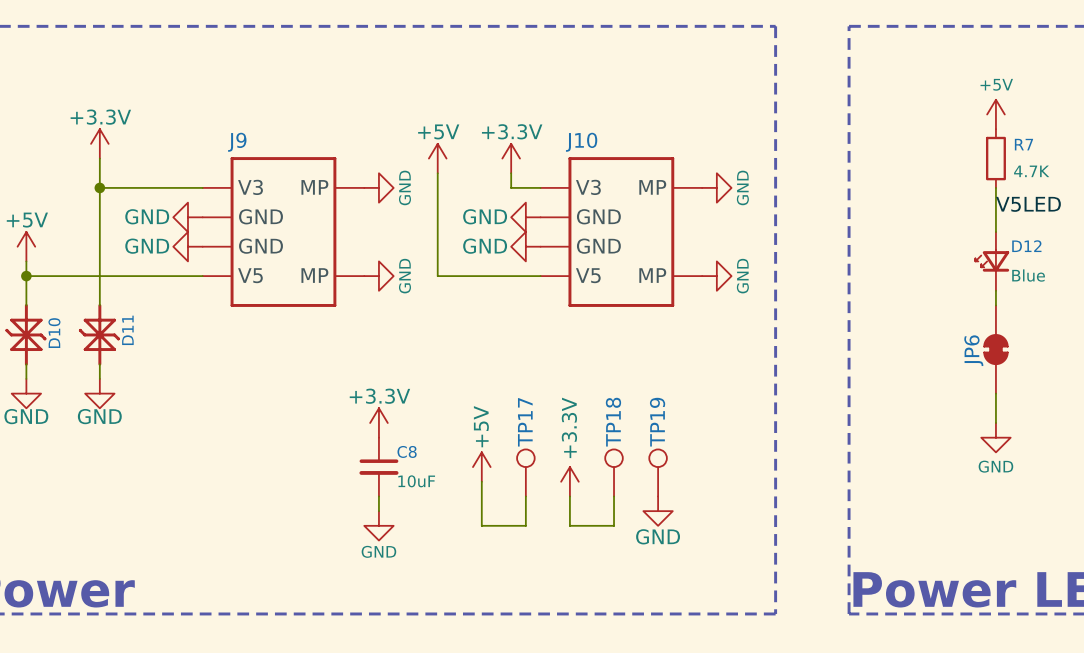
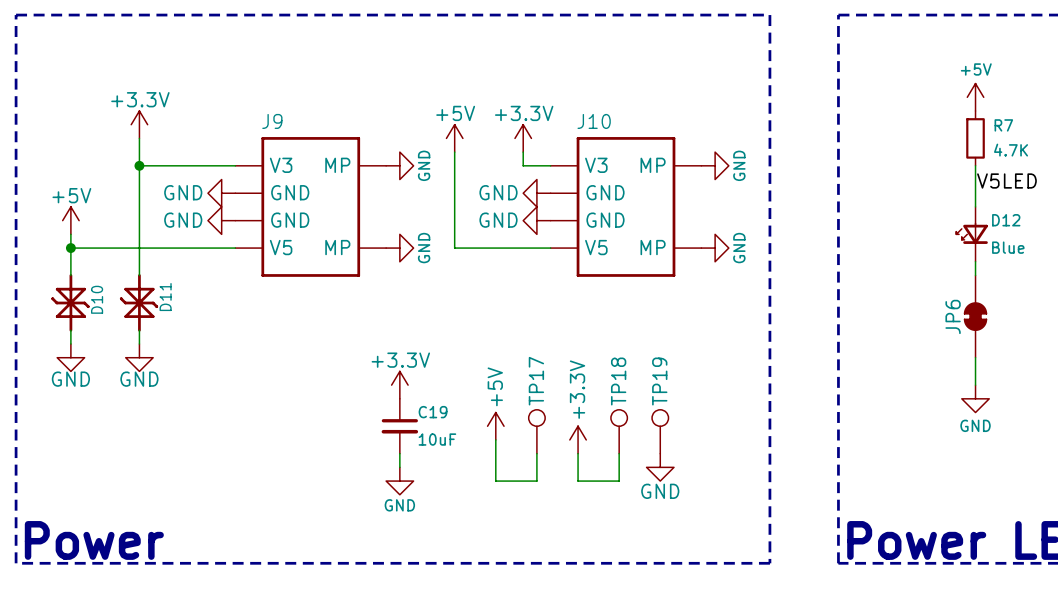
C8 name: C8 (407, 451) -> C19 (433, 412)

